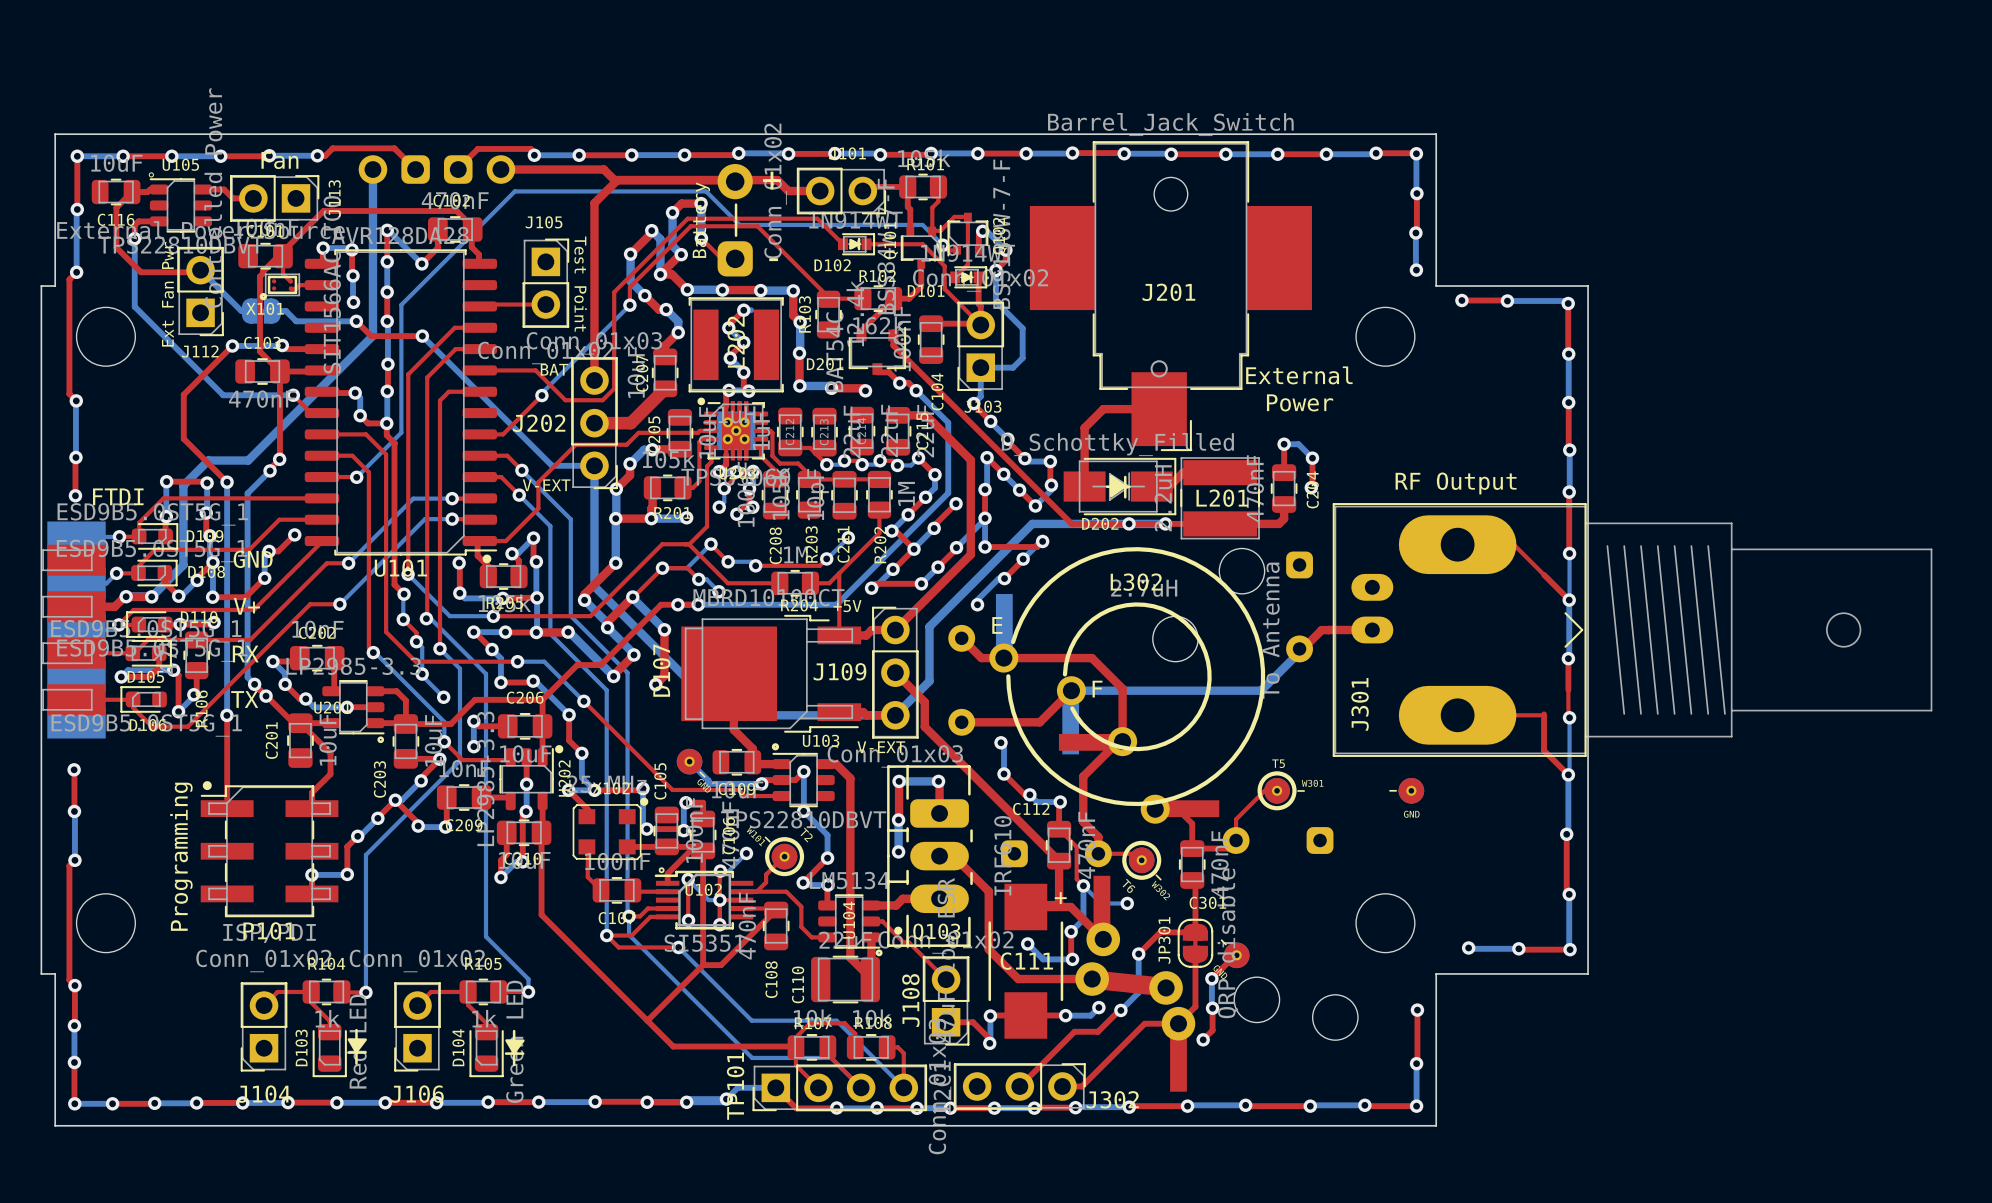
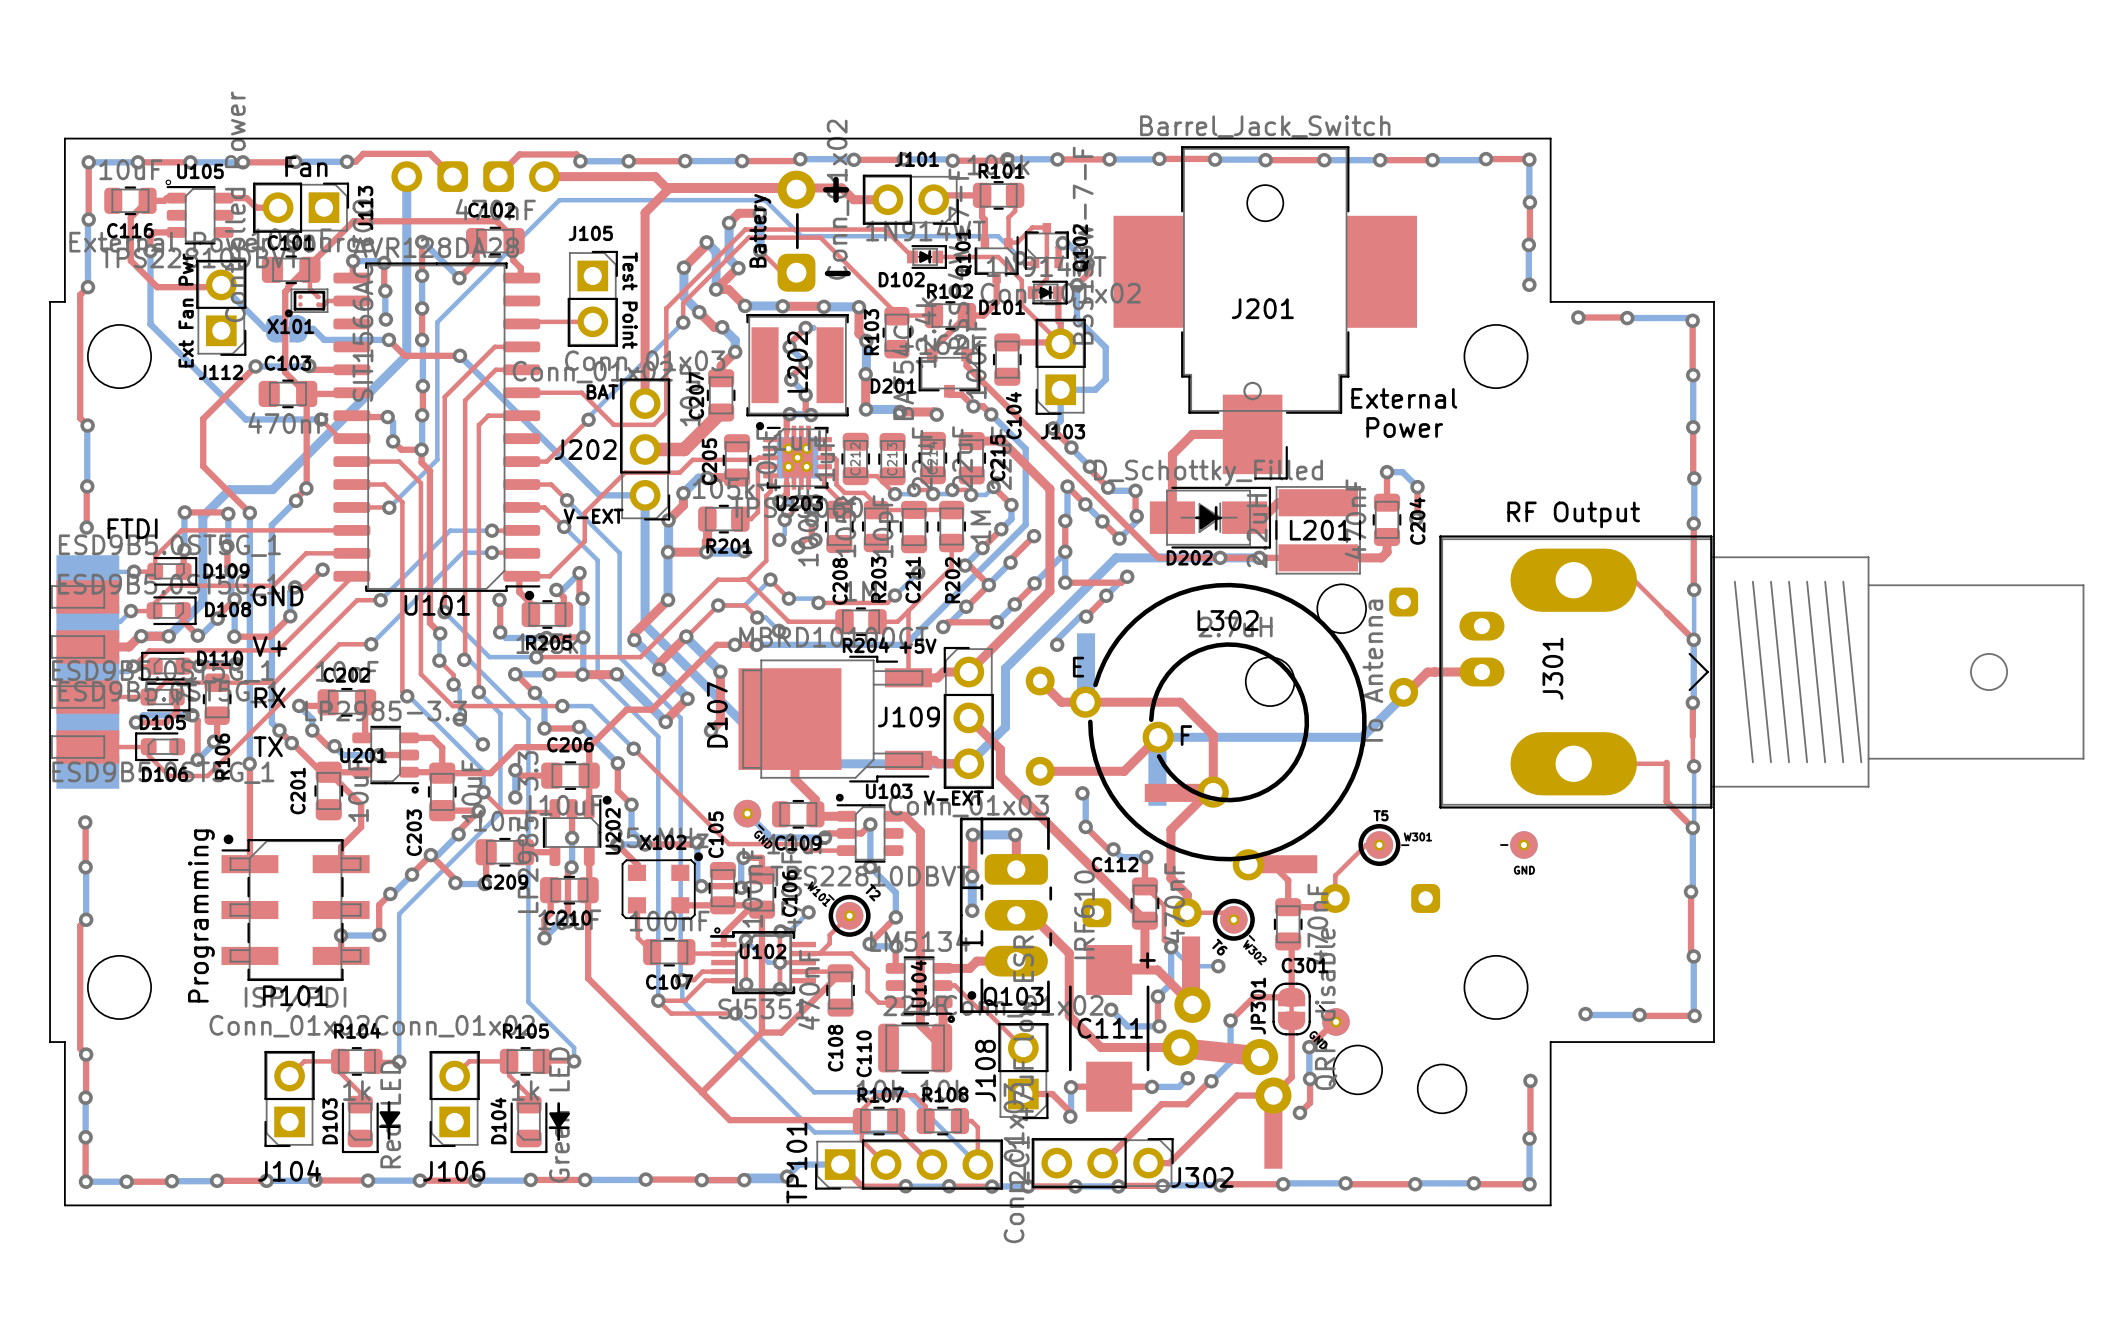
J301 name position: J301 (1360, 704) -> J301 (1552, 668)

